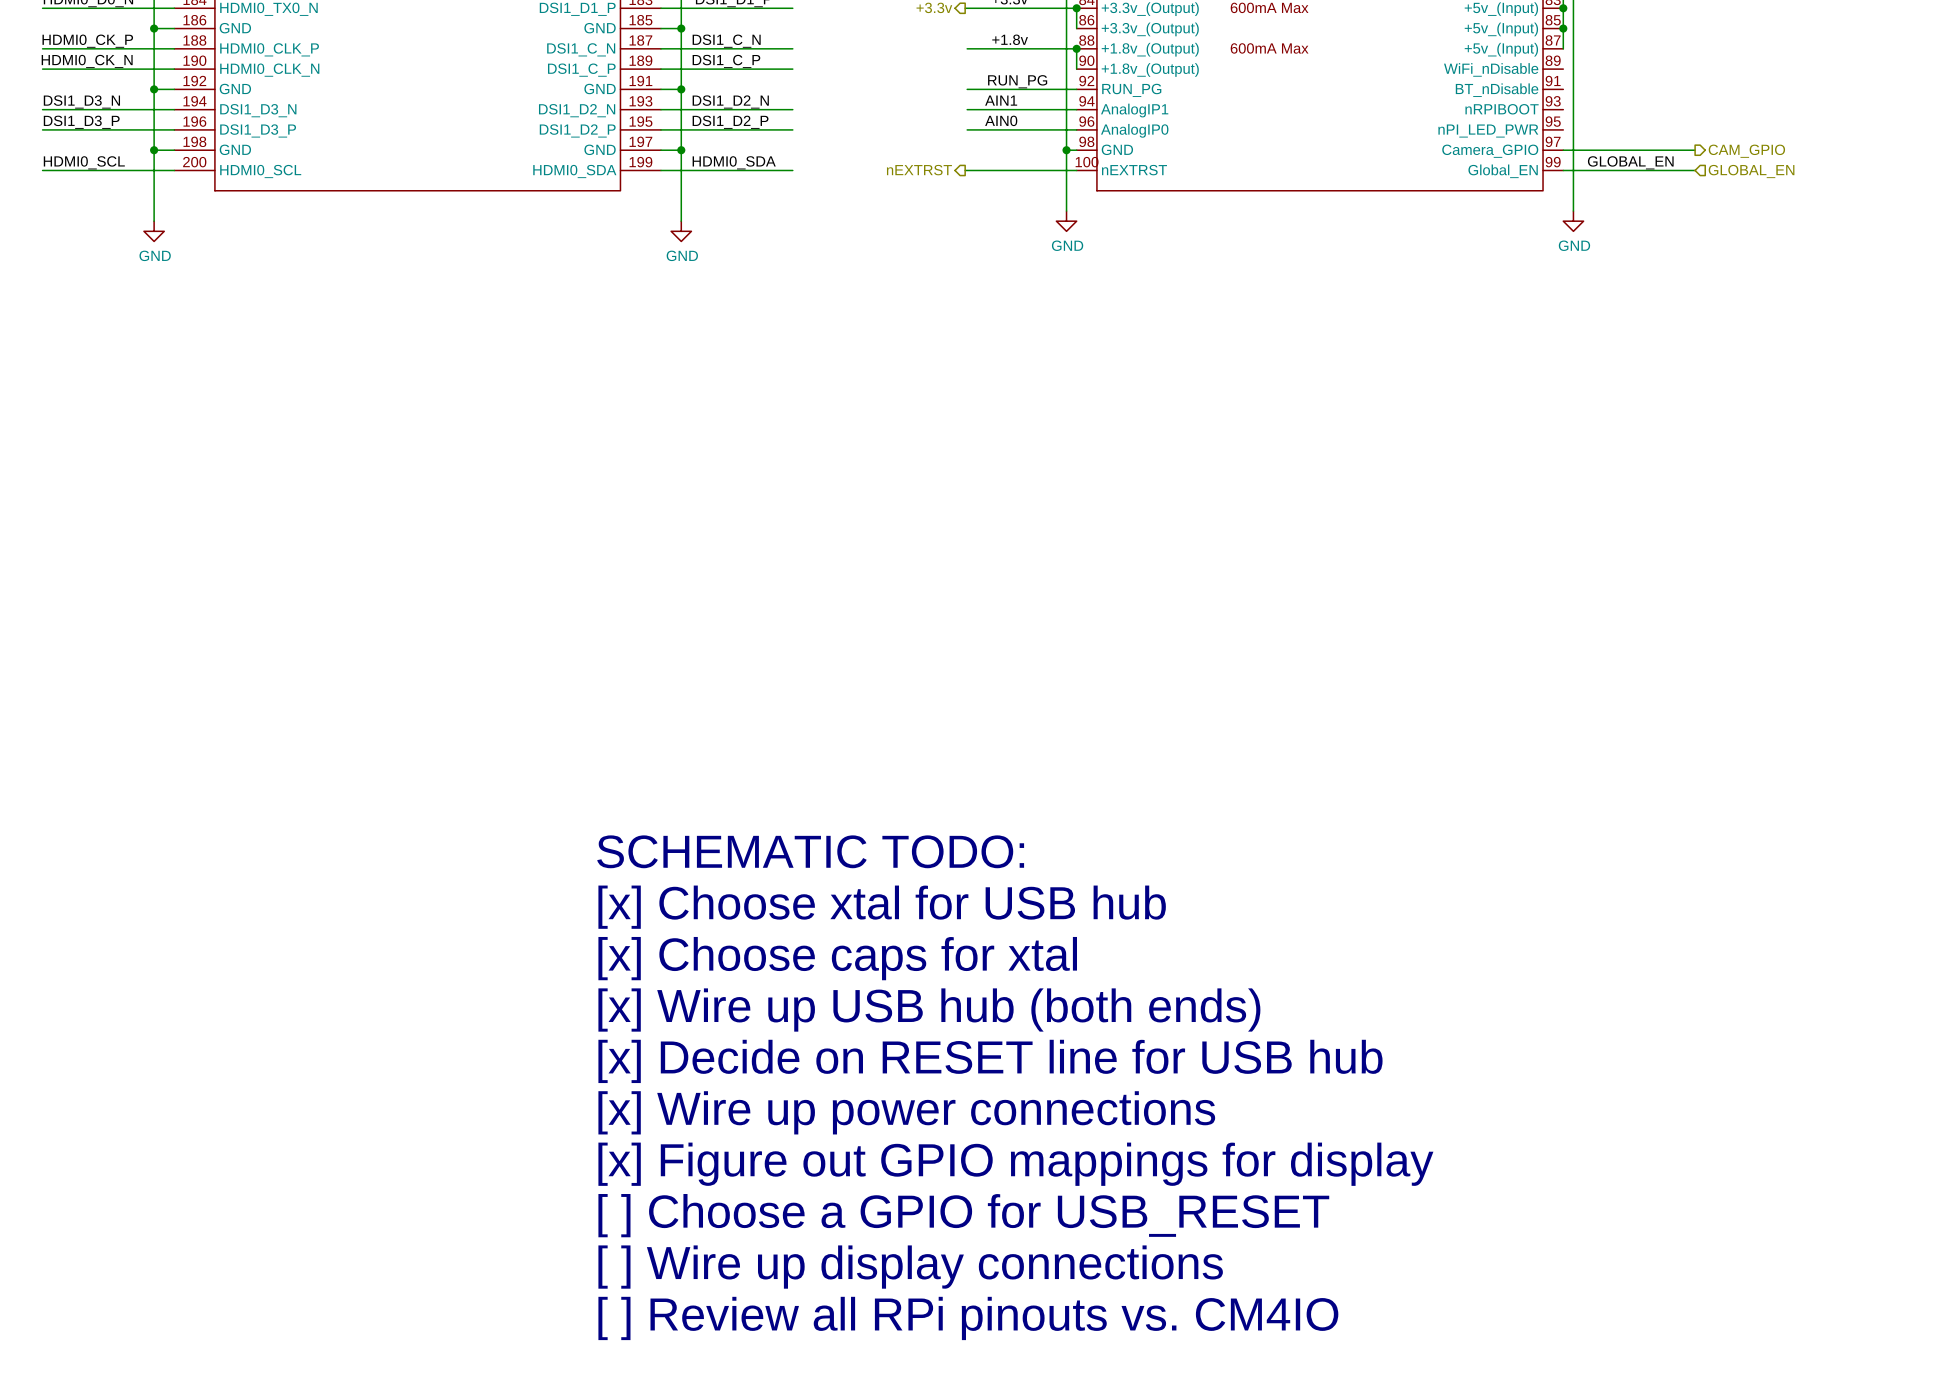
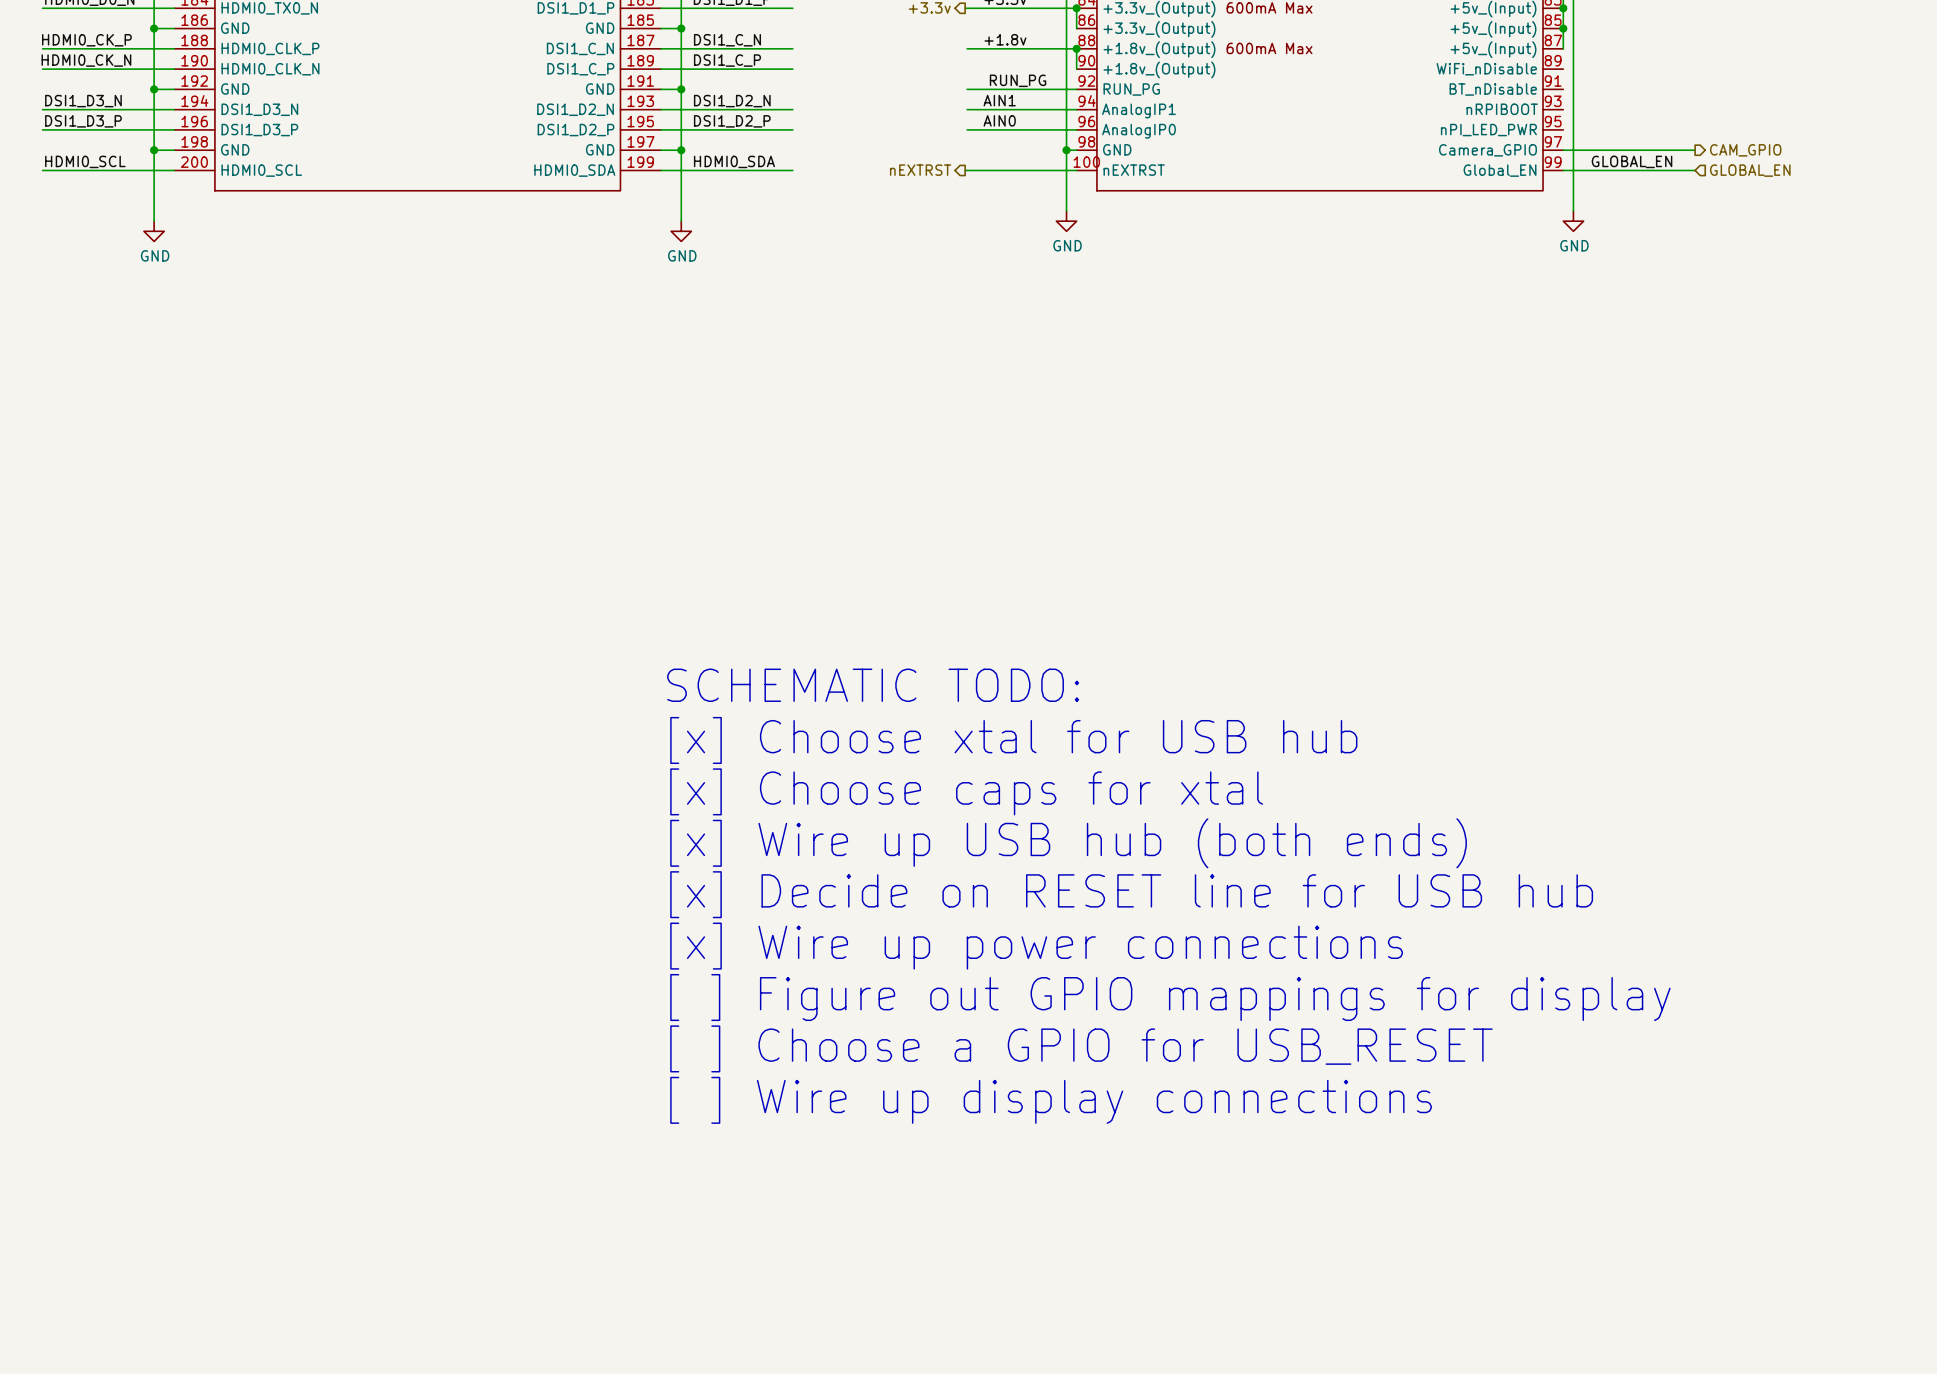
text position: SCHEMATIC TODO: (810, 851) -> SCHEMATIC TODO: (873, 685)
text position: [x] Choose xtal for USB hub (882, 907) -> [x] Choose xtal for USB hub (1013, 740)
text position: [x] Choose caps for xtal (837, 958) -> [x] Choose caps for xtal (966, 791)
text: none -> [ ] Figure out GPIO mappings for display (1170, 997)
text position: [x] Wire up USB hub (both ends) (929, 1010) -> [x] Wire up USB hub (both ends) (1068, 843)
text position: [x] Decide on RESET line for USB hub (990, 1061) -> [x] Decide on RESET line for USB hub (1131, 894)
text position: [x] Wire up power connections (906, 1112) -> [x] Wire up power connections (1036, 946)
text: [x] Figure out GPIO mappings for display (1015, 1164) -> none
text position: [ ] Choose a GPIO for USB_RESET (963, 1215) -> [ ] Choose a GPIO for USB_RESET (1081, 1048)
text position: [ ] Wire up display connections (910, 1267) -> [ ] Wire up display connections (1051, 1100)
text: [ ] Review all RPi pinouts vs. CM4IO (968, 1318) -> none

